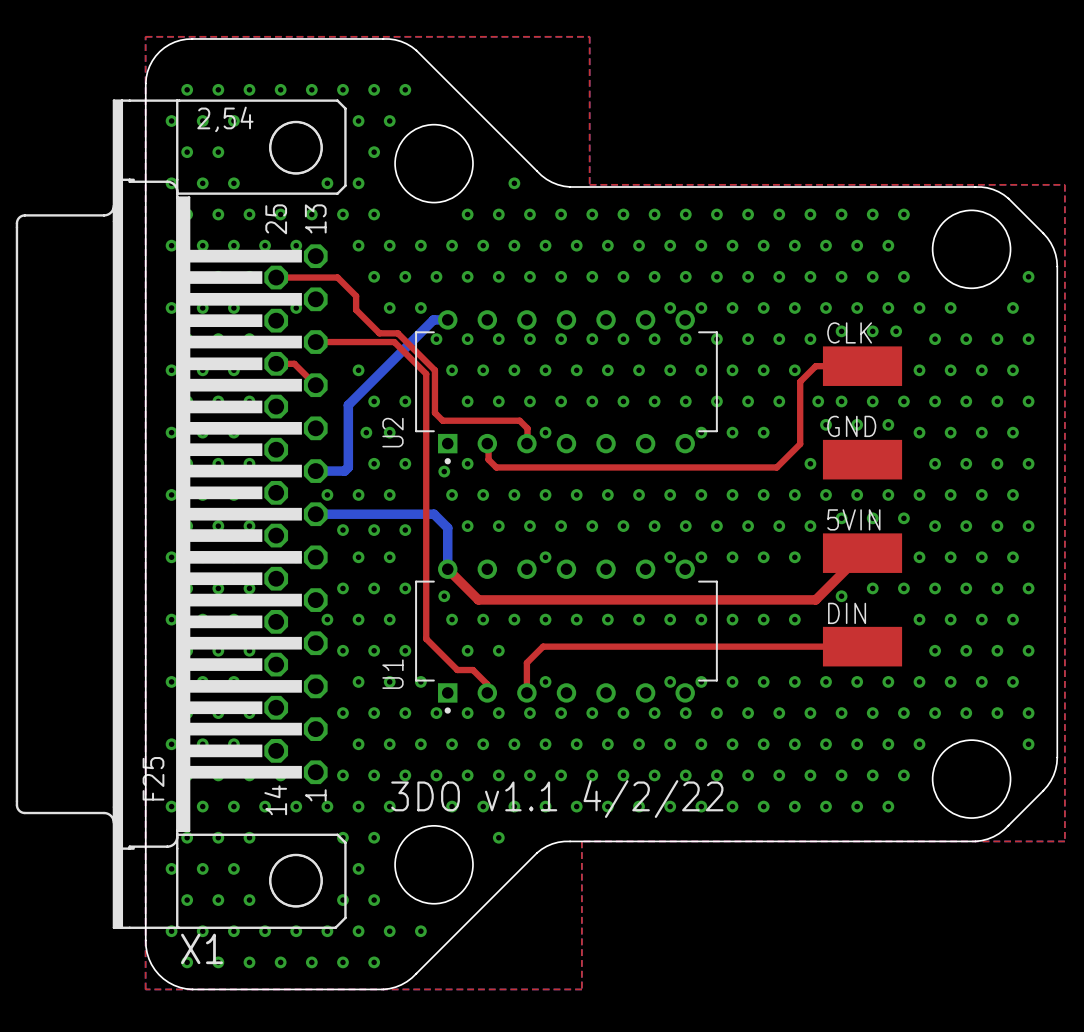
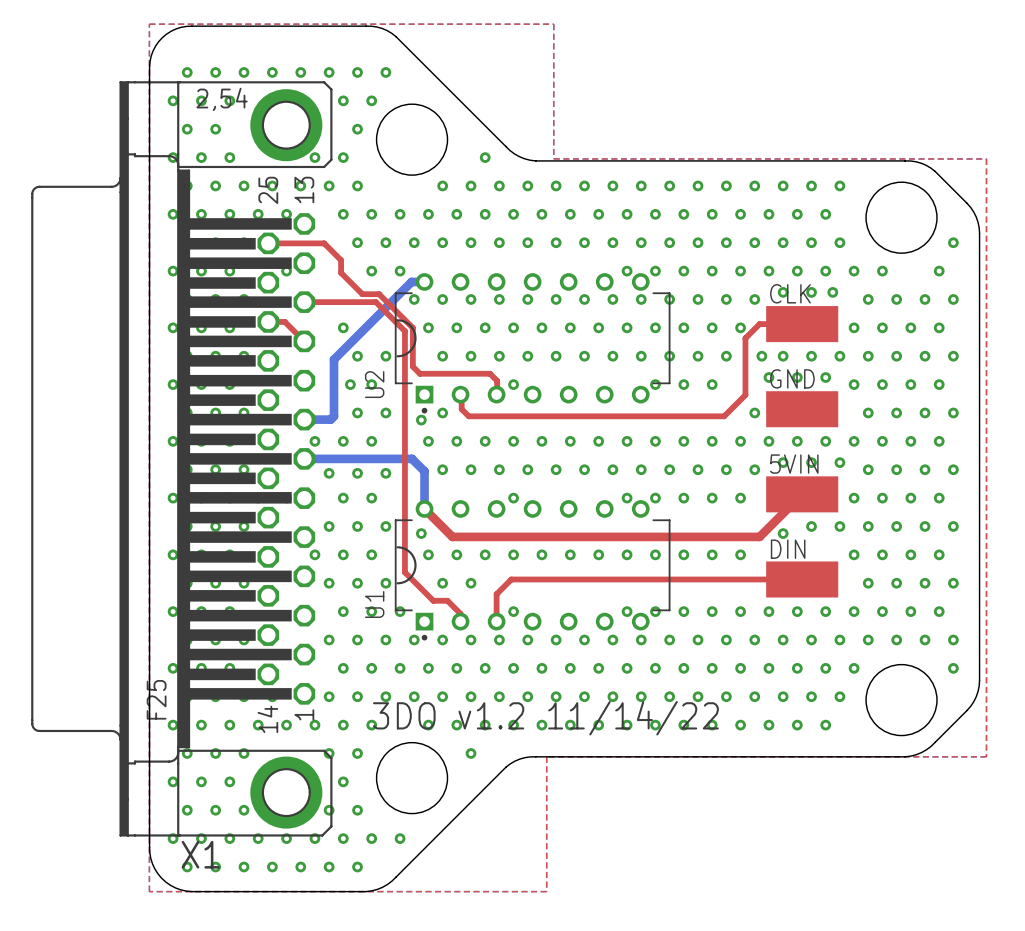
X1 footprint: [15, 99, 347, 929] -> [31, 81, 333, 837]
U2 footprint: [415, 310, 718, 465] -> [394, 273, 671, 414]
U1 footprint: [415, 559, 718, 714] -> [394, 500, 671, 641]
text: 3DO v1.1 4/2/22 (557, 799) -> 3DO v1.2 11/14/22 (545, 718)

